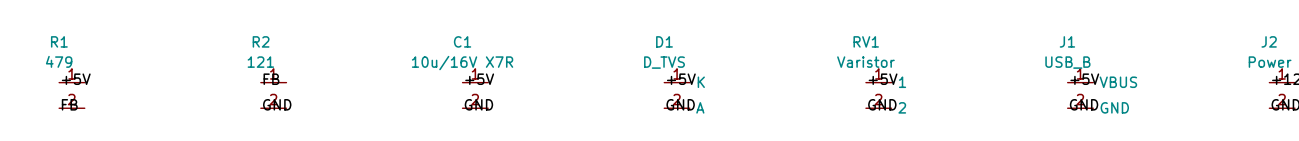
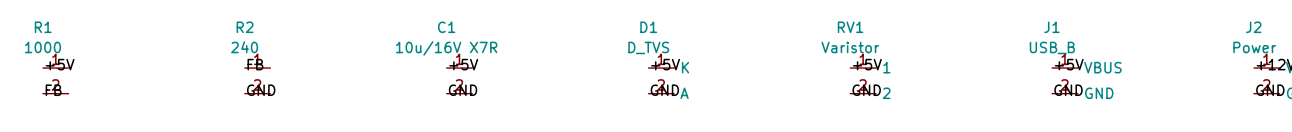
R1 value: 479 (59, 61) -> 1000 (42, 47)
R2 value: 121 (260, 62) -> 240 (244, 47)

